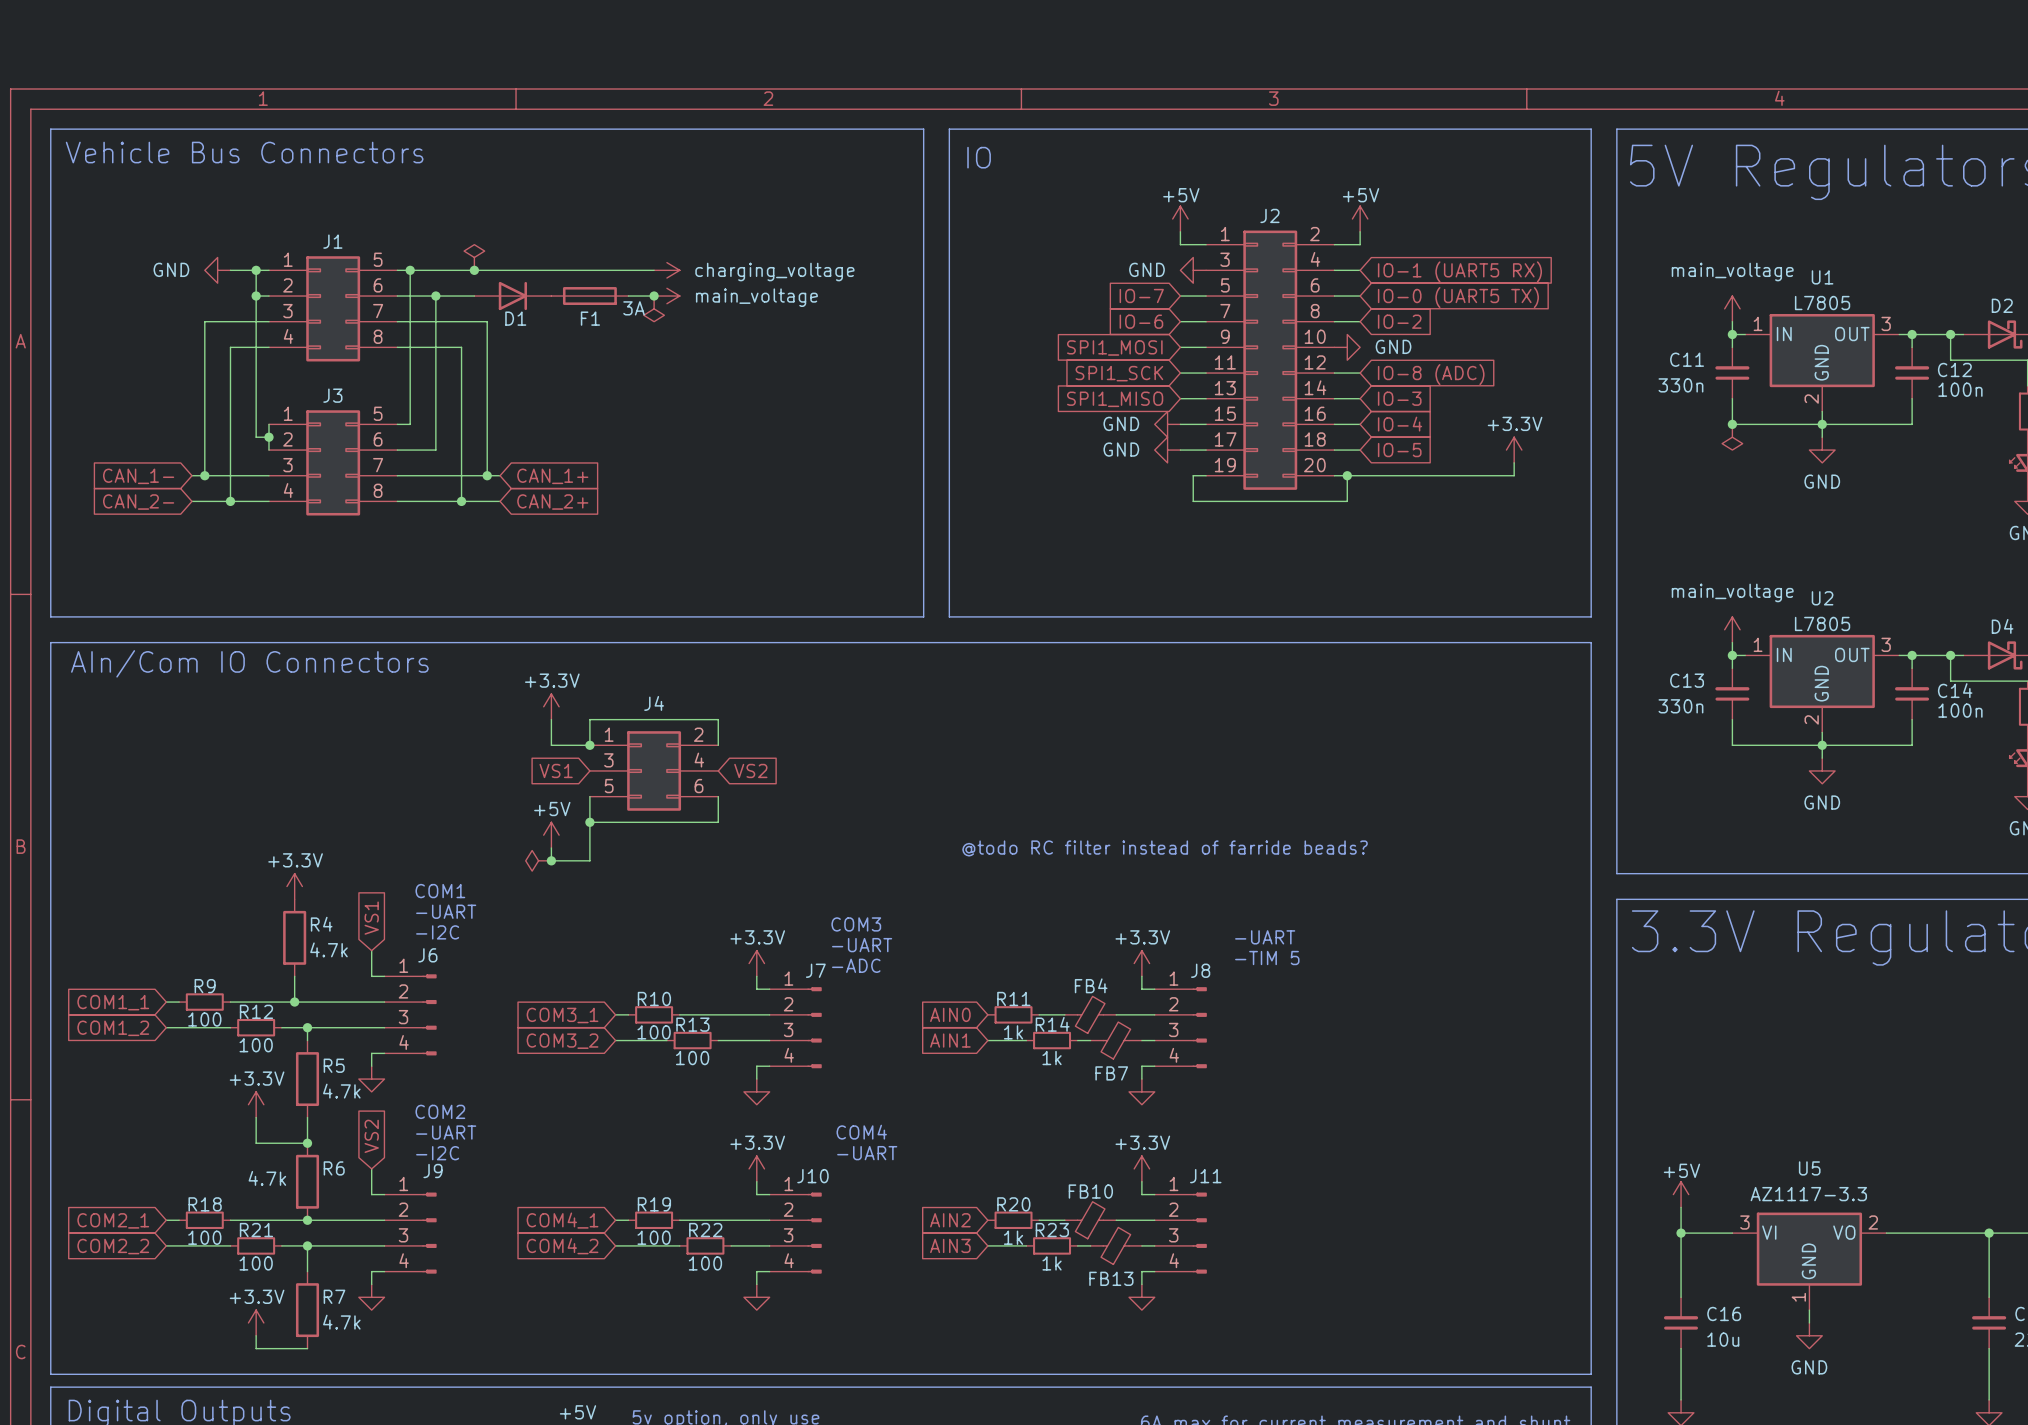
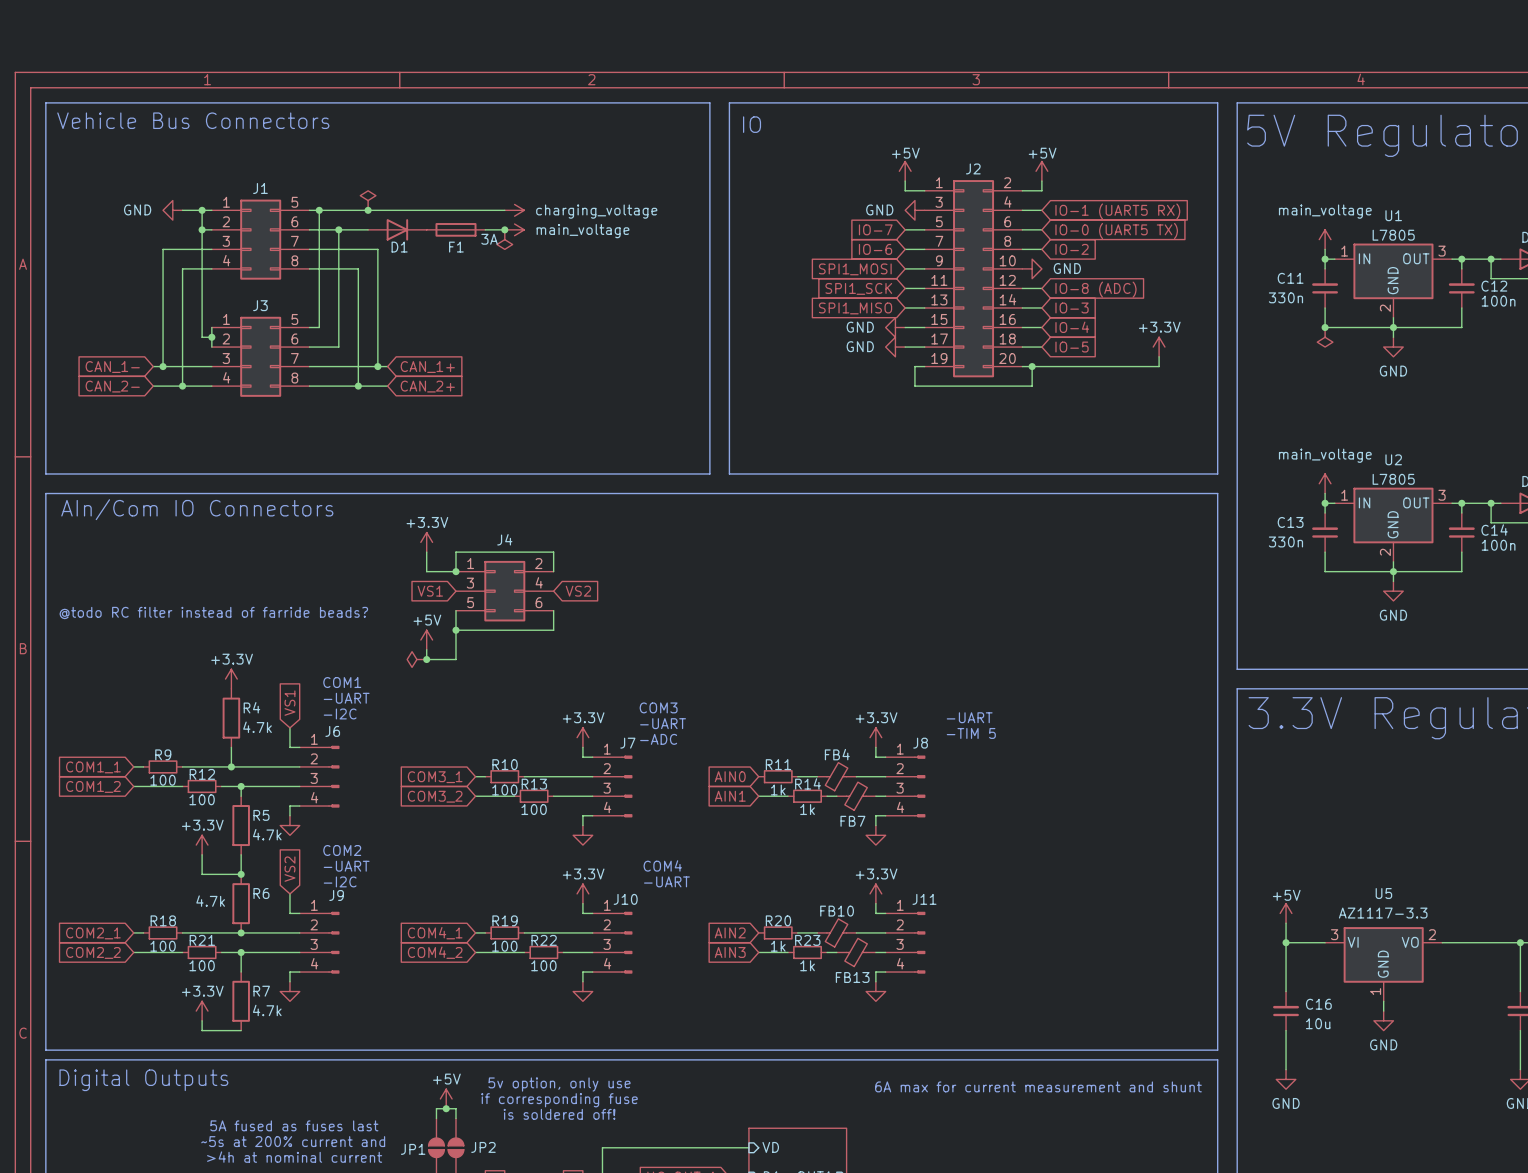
text: none -> @todo RC filter instead of farride beads? (213, 613)
text: @todo RC filter instead of farride beads? (1165, 848) -> none

